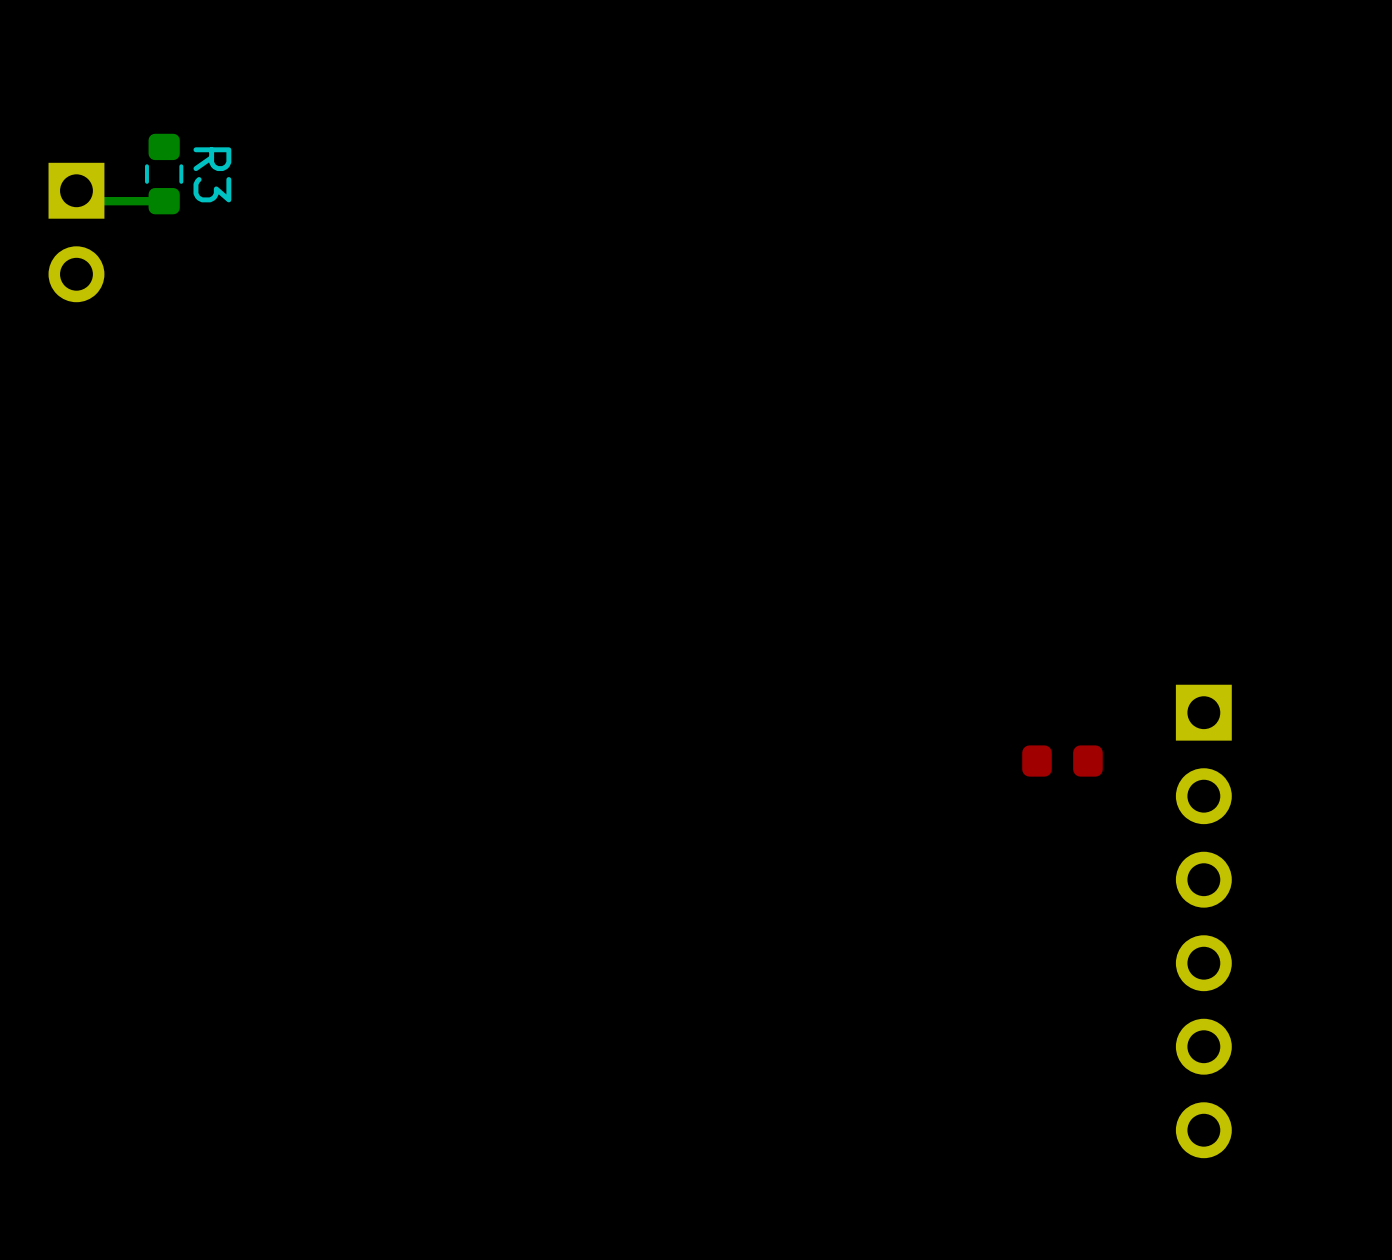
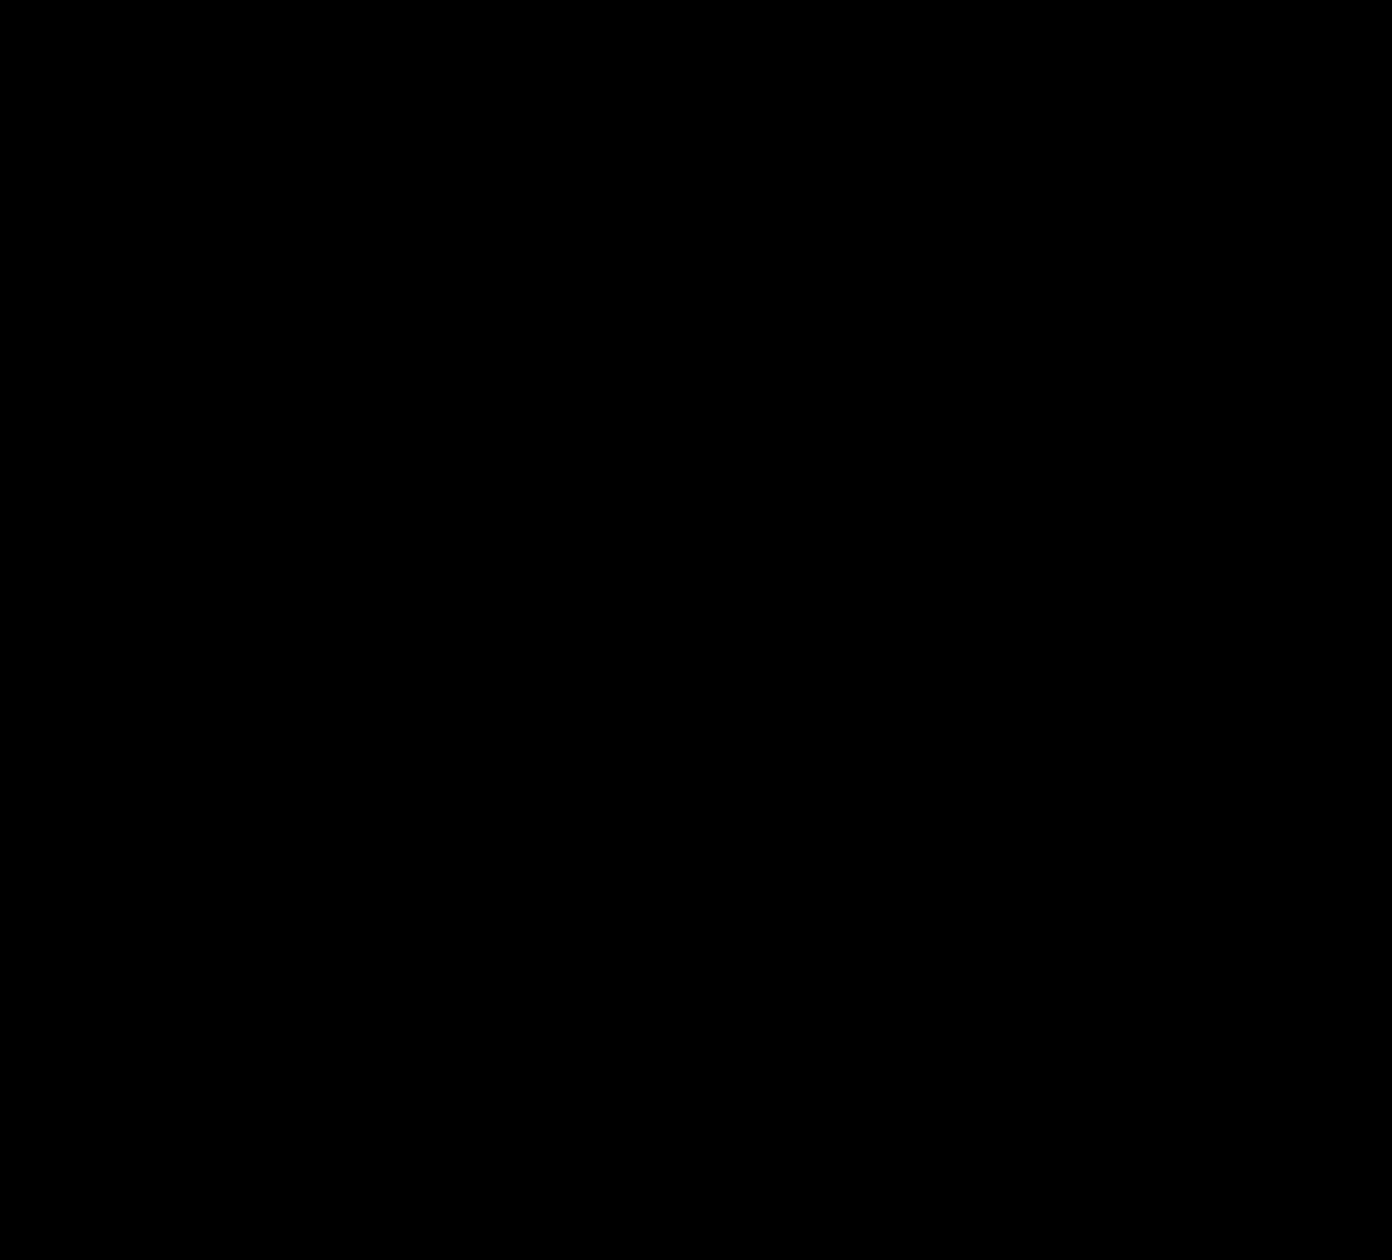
R3: (164, 174) -> none
bottom track: (76, 190) (86, 201) (164, 201) -> none
part: (76, 232) -> none
part: (1062, 761) -> none
part: (1203, 921) -> none

